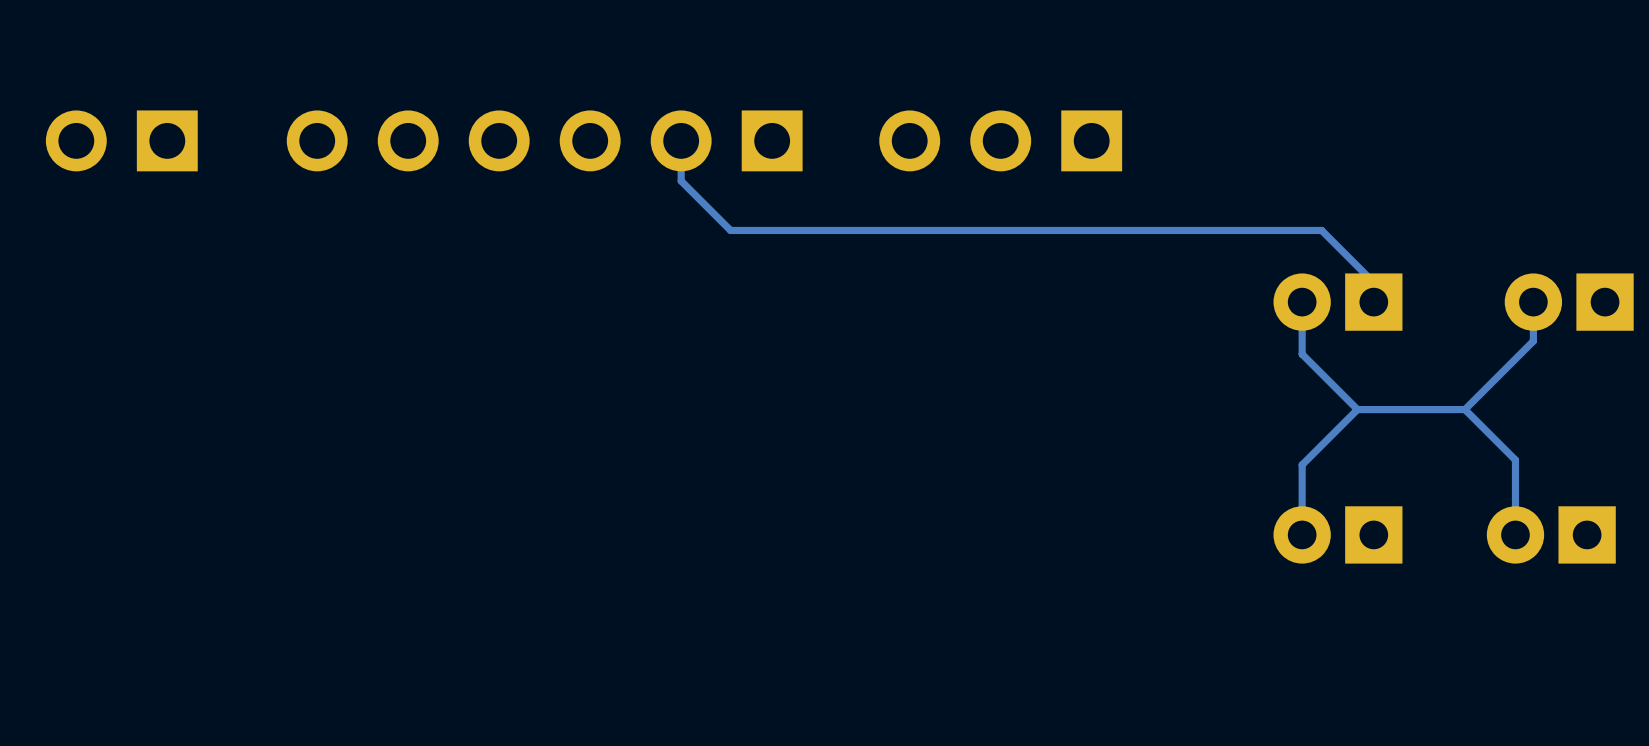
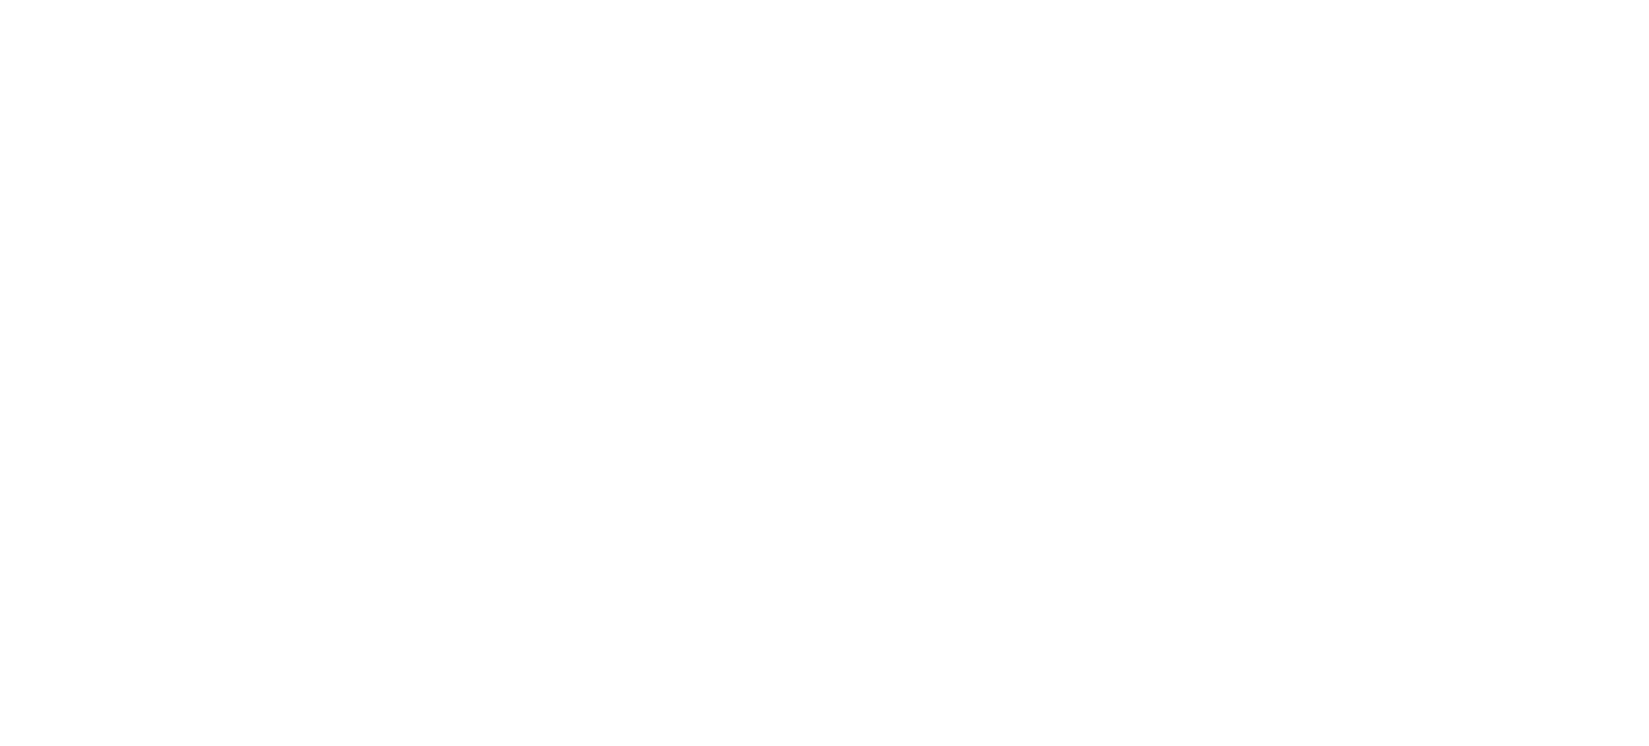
part: (121, 140) -> none
part: (544, 140) -> none
track: (681, 140) (681, 181) (730, 230) (1321, 230) (1373, 282) (1373, 302) -> none
part: (1000, 140) -> none
track: (1302, 302) (1302, 354) (1357, 409) -> none
part: (1337, 302) -> none
track: (1533, 302) (1533, 341) (1464, 409) -> none
part: (1569, 302) -> none
track: (1357, 409) (1302, 464) (1302, 534) -> none
track: (1464, 409) (1515, 460) (1515, 534) -> none
track: (1464, 409) (1357, 409) -> none
part: (1337, 534) -> none
part: (1551, 534) -> none

